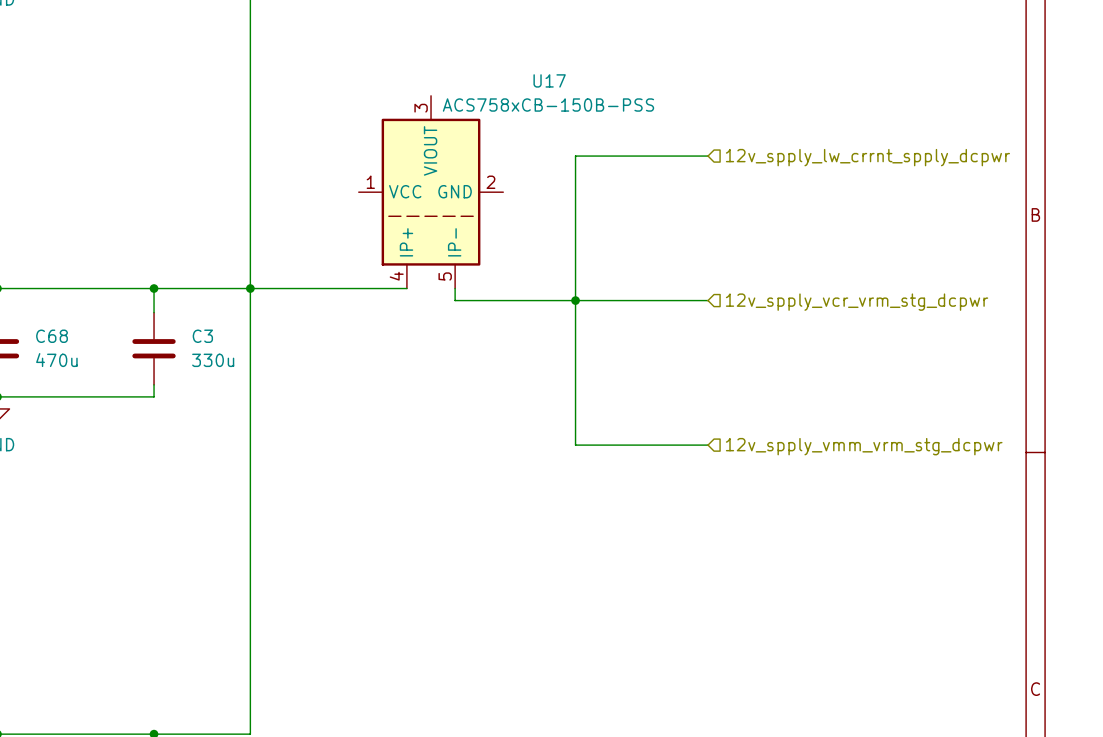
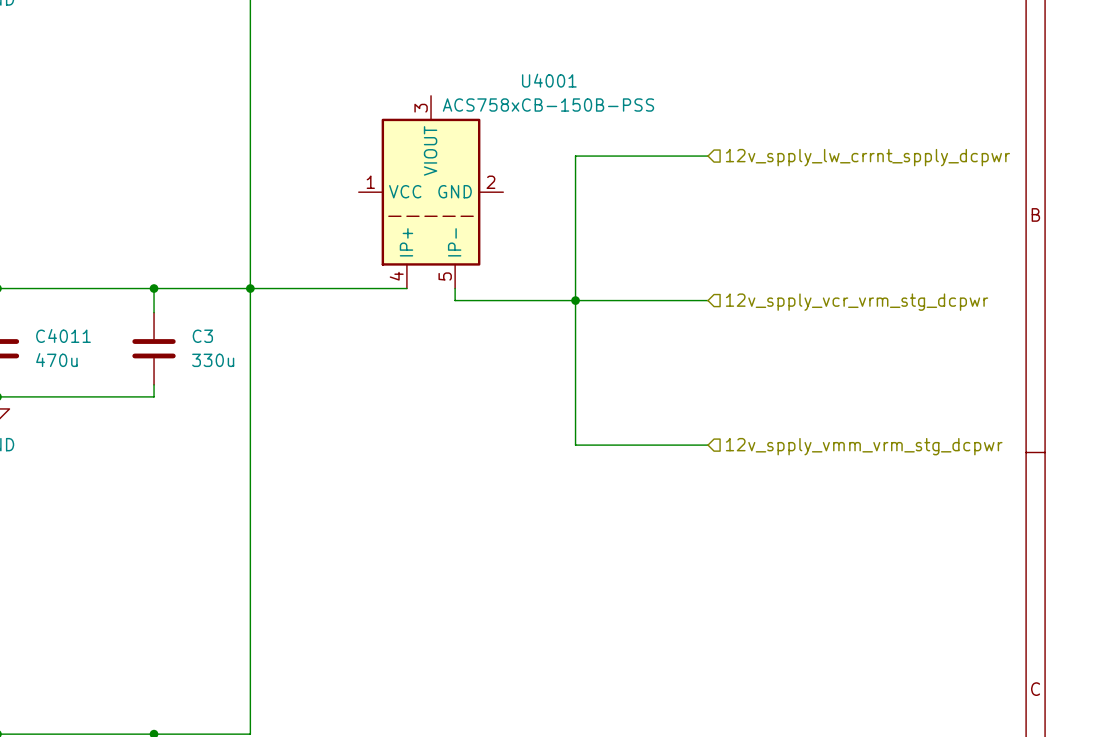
U17 name: U17 (549, 80) -> U4001 (549, 80)
C68 name: C68 (52, 336) -> C4011 (63, 335)

